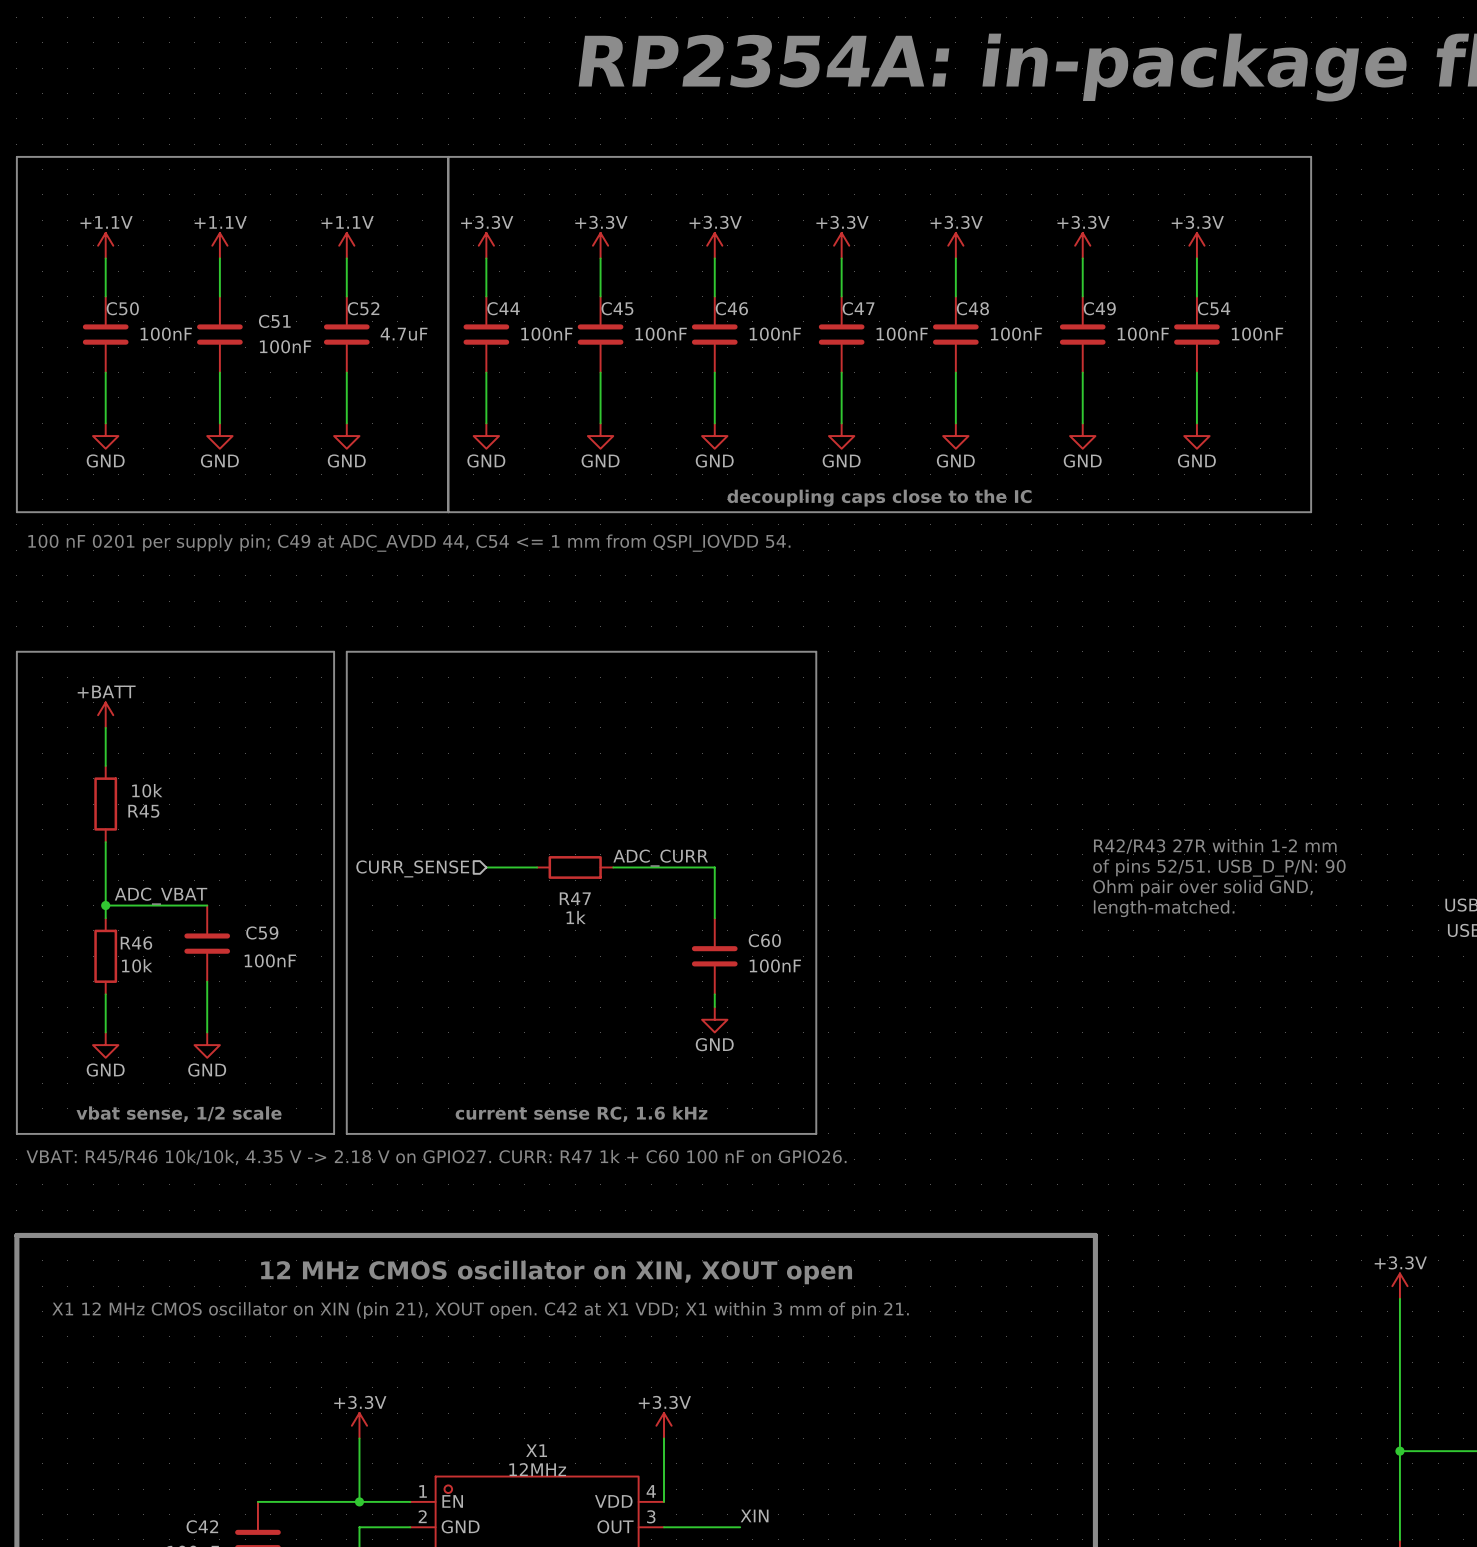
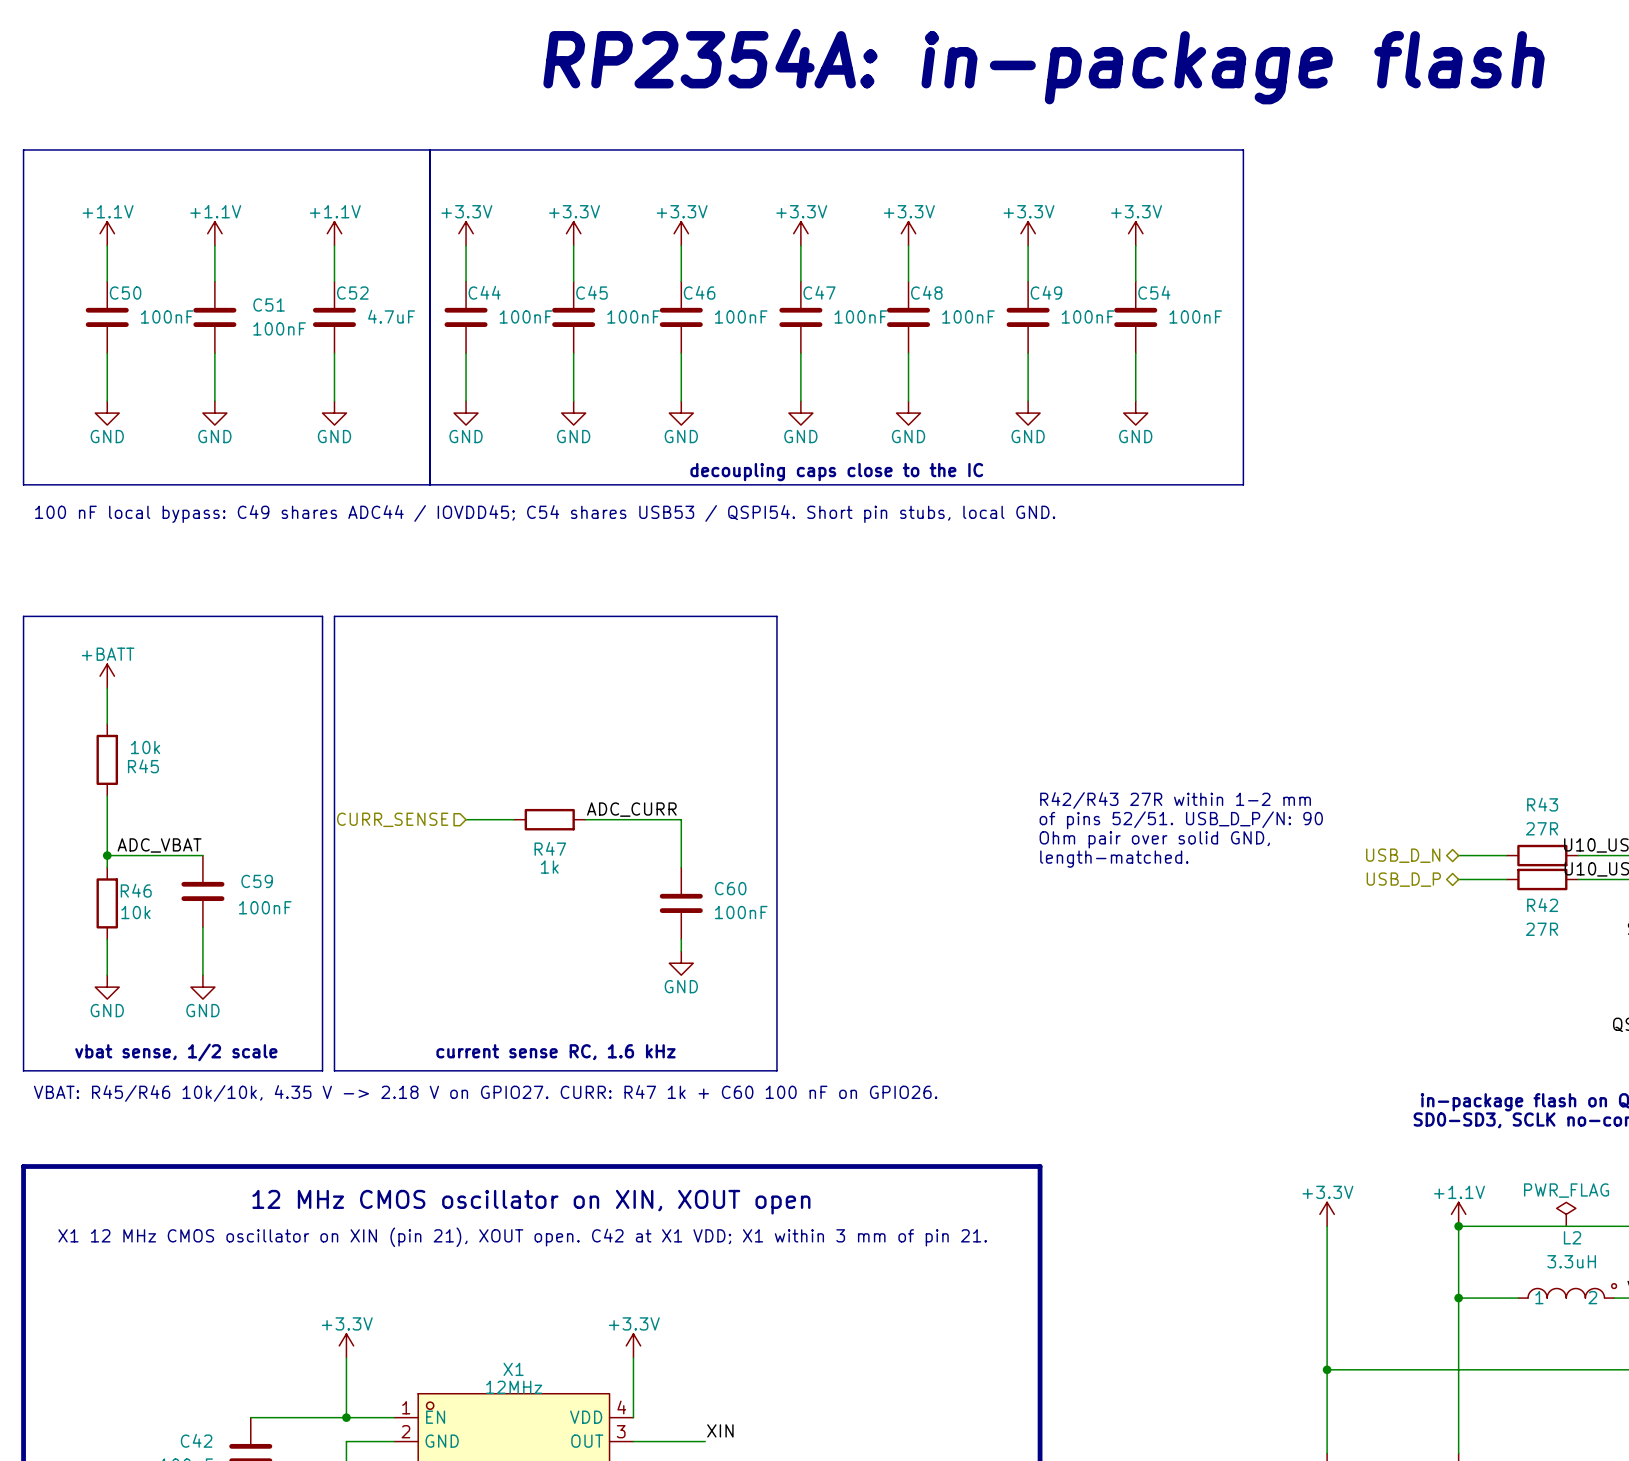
text: 100 nF 0201 per supply pin; C49 at ADC_AVDD 44, C54 <= 1 mm from QSPI_IOVDD 54. (409, 543) -> 100 nF local bypass: C49 shares ADC44 / IOVDD45; C54 shares USB53 / QSPI54. Short pin stubs, local GND. (545, 514)

